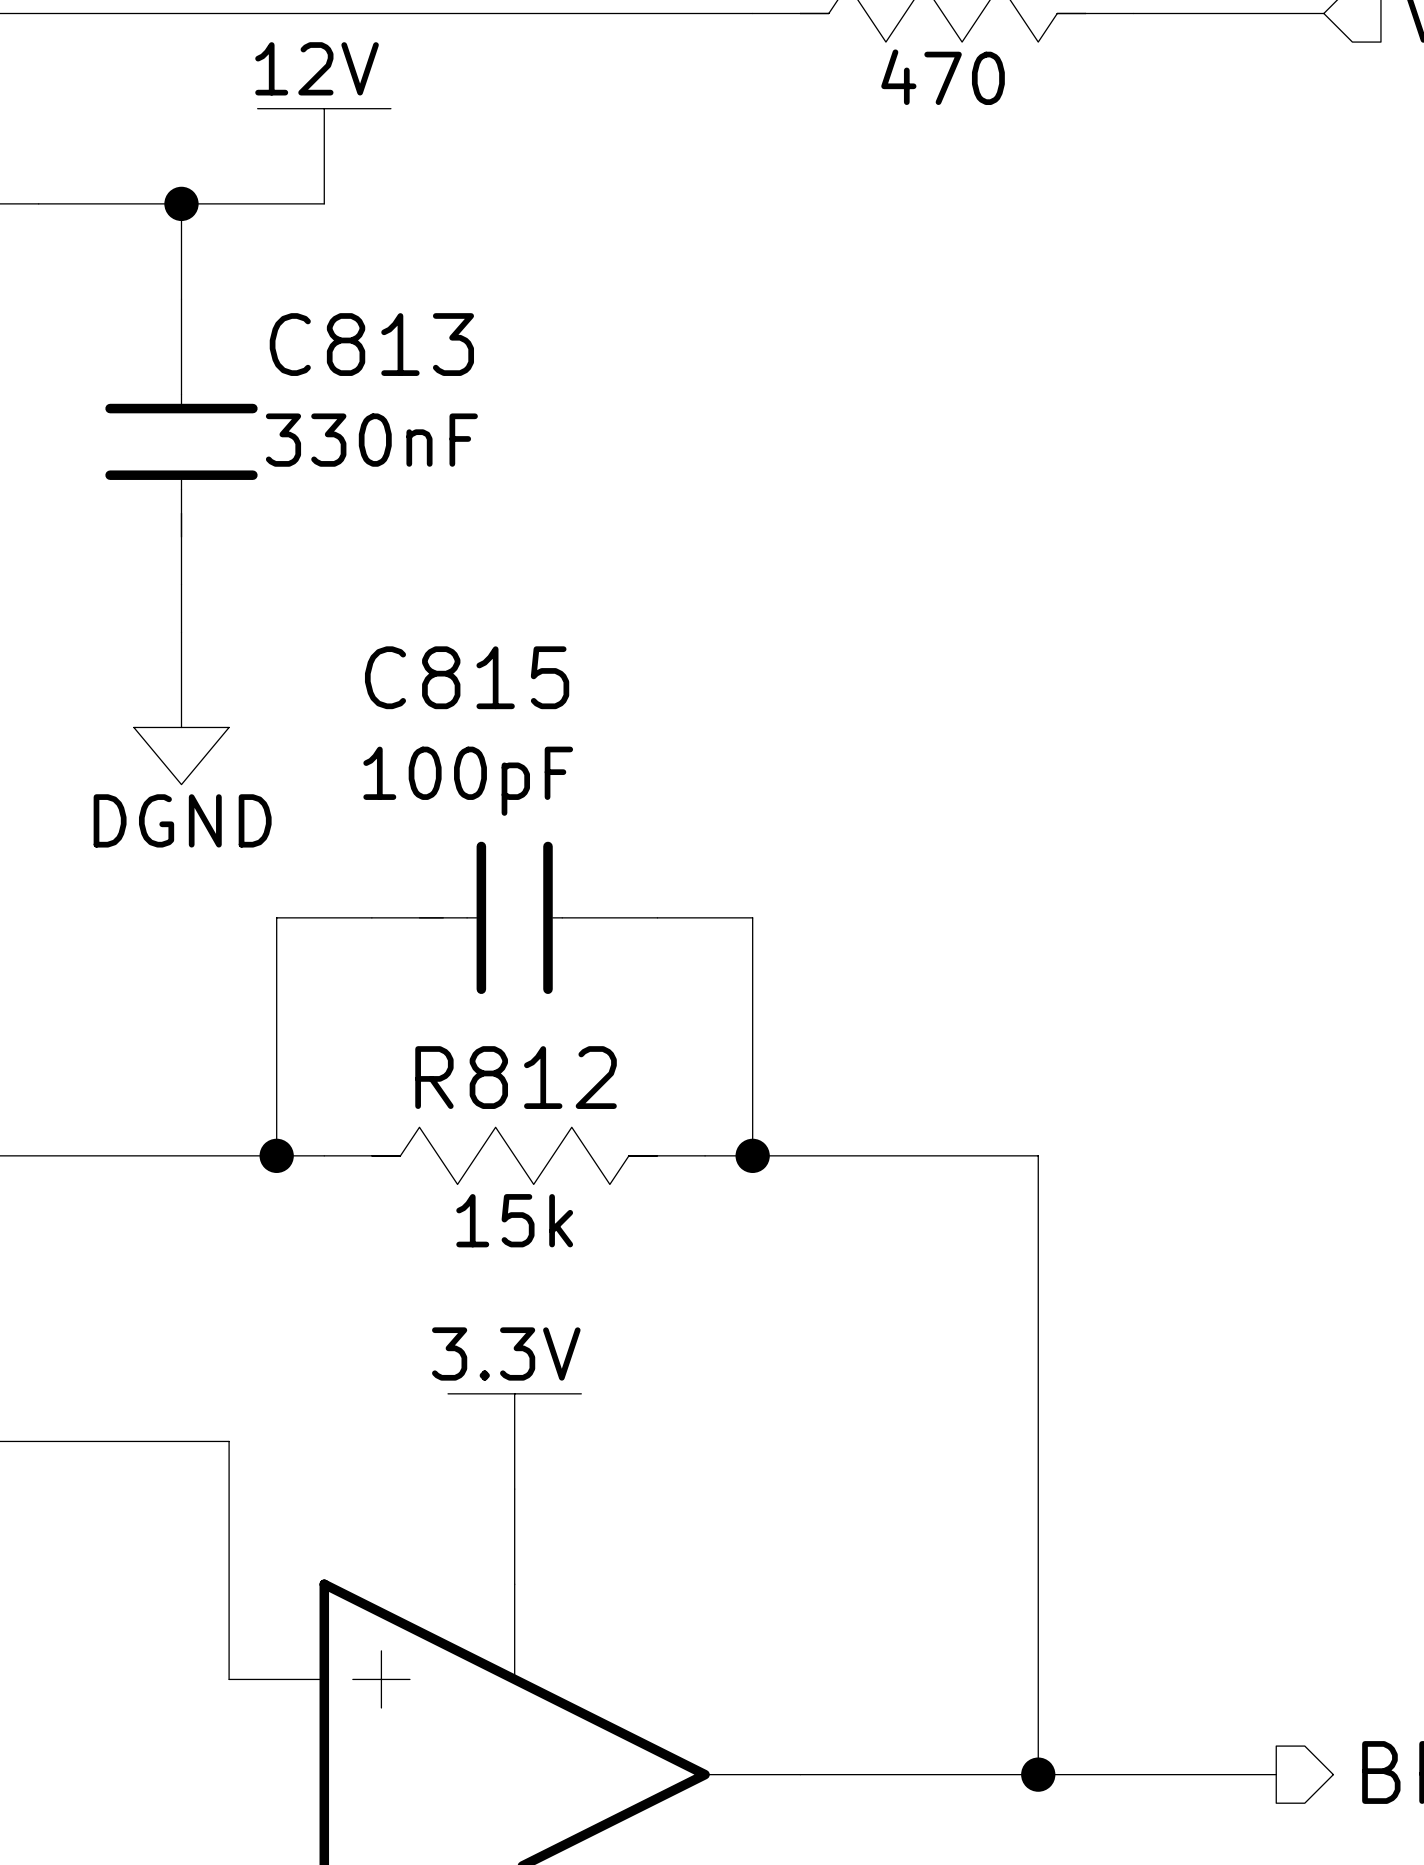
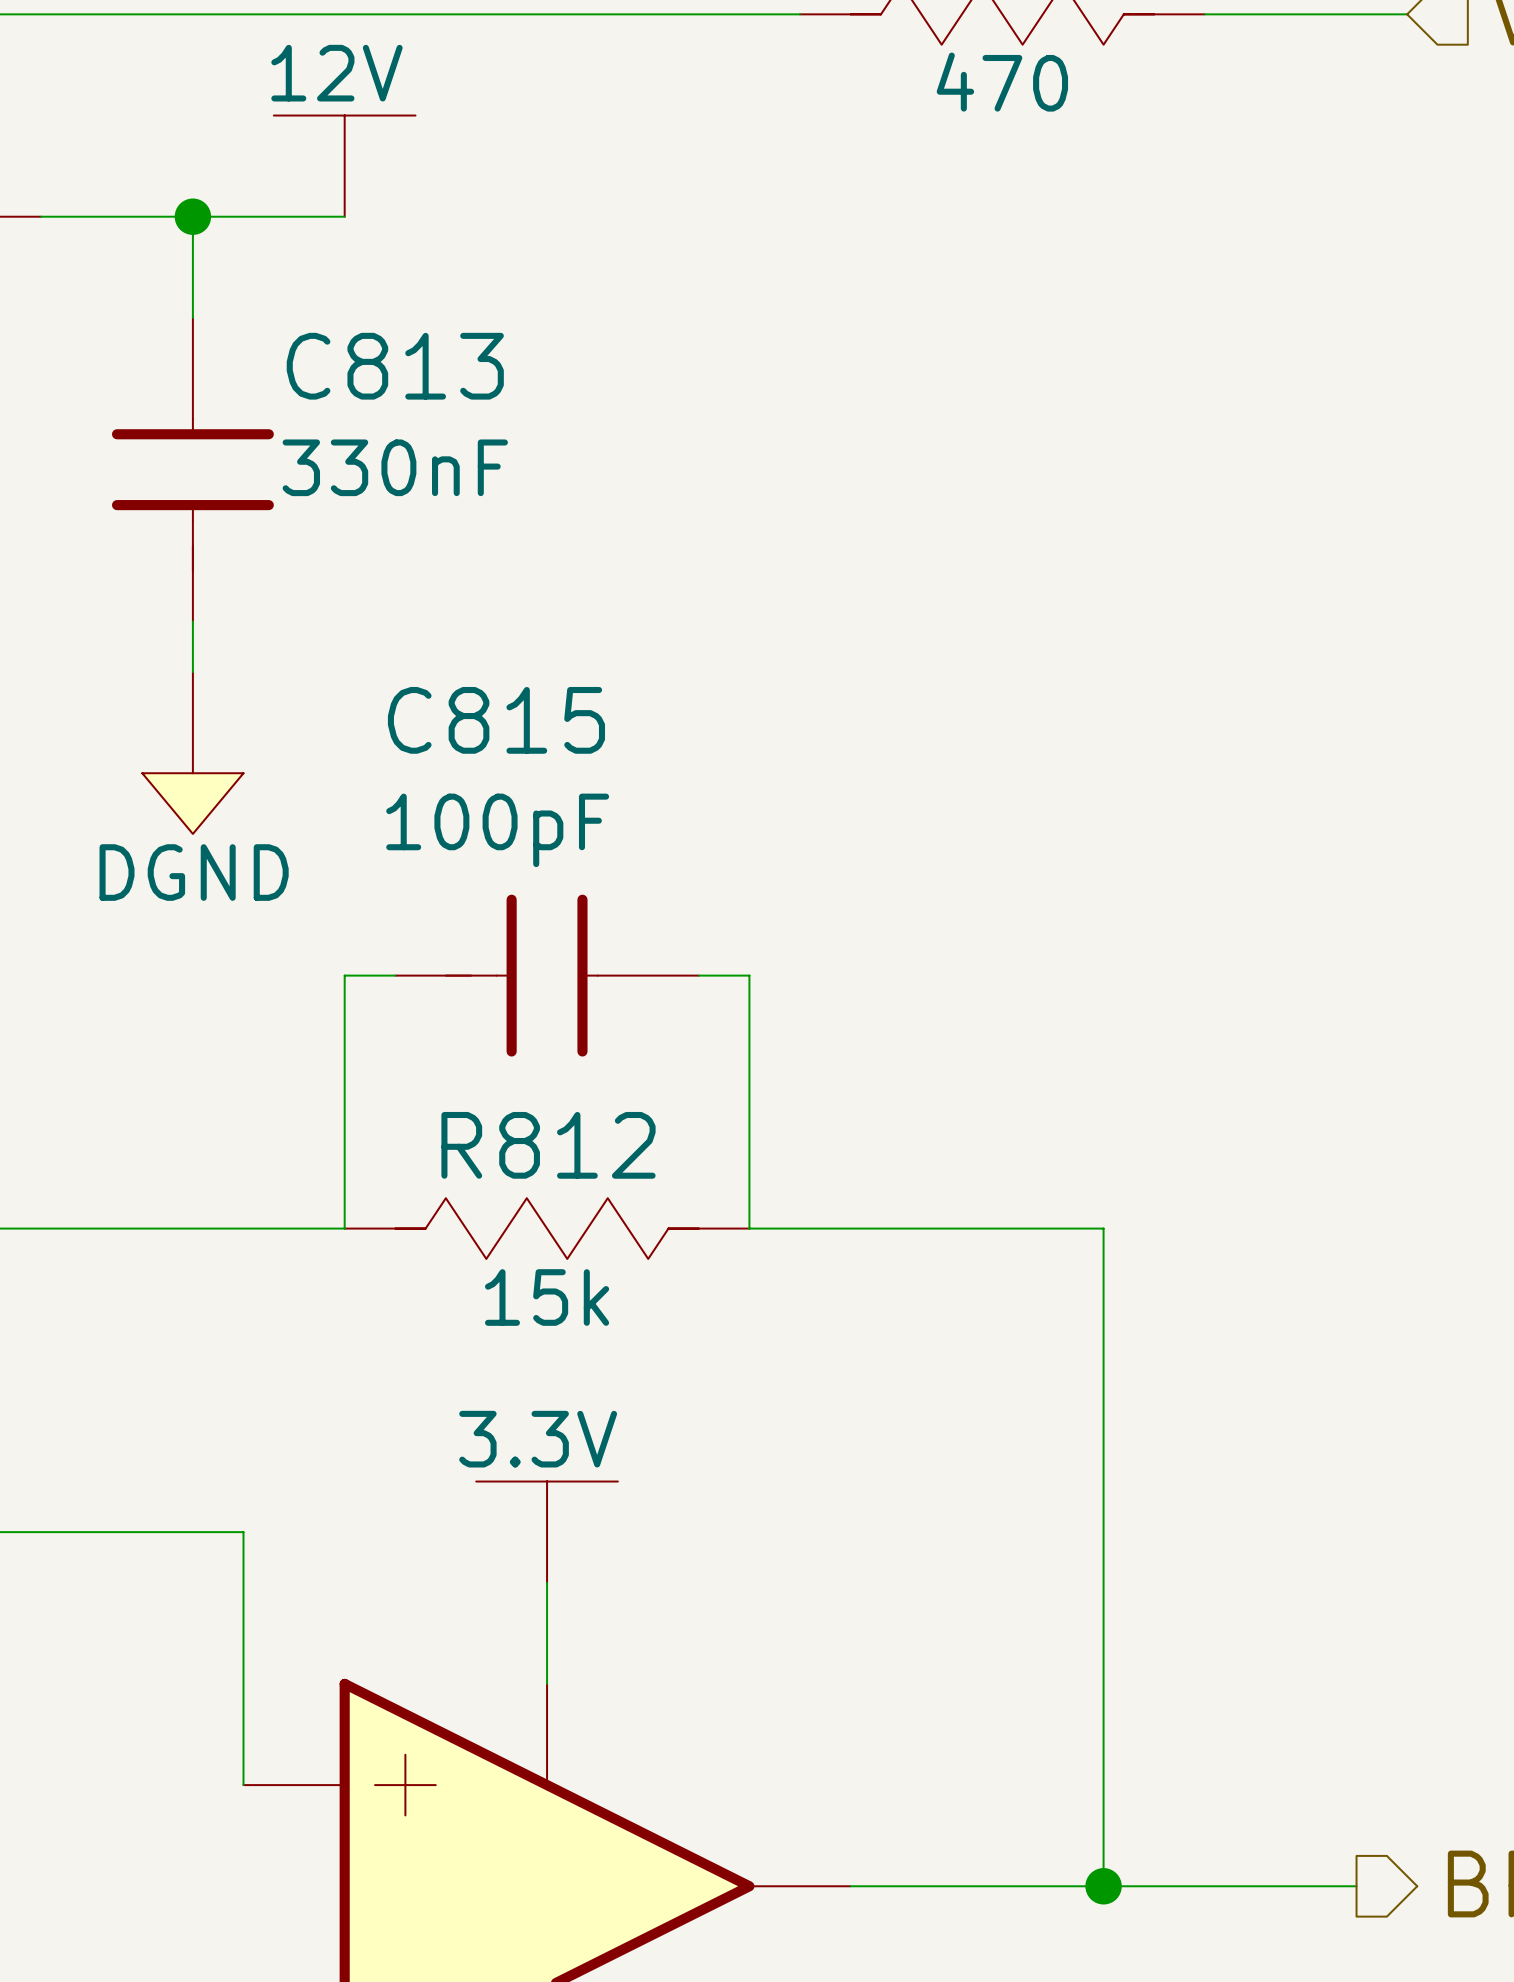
wire: (324, 917) (276, 917) (276, 1155) -> (344, 975) (344, 1228)
wire: (705, 917) (752, 917) (752, 1155) -> (749, 975) (749, 1228)
junction: (276, 1155) -> none
junction: (752, 1155) -> none

